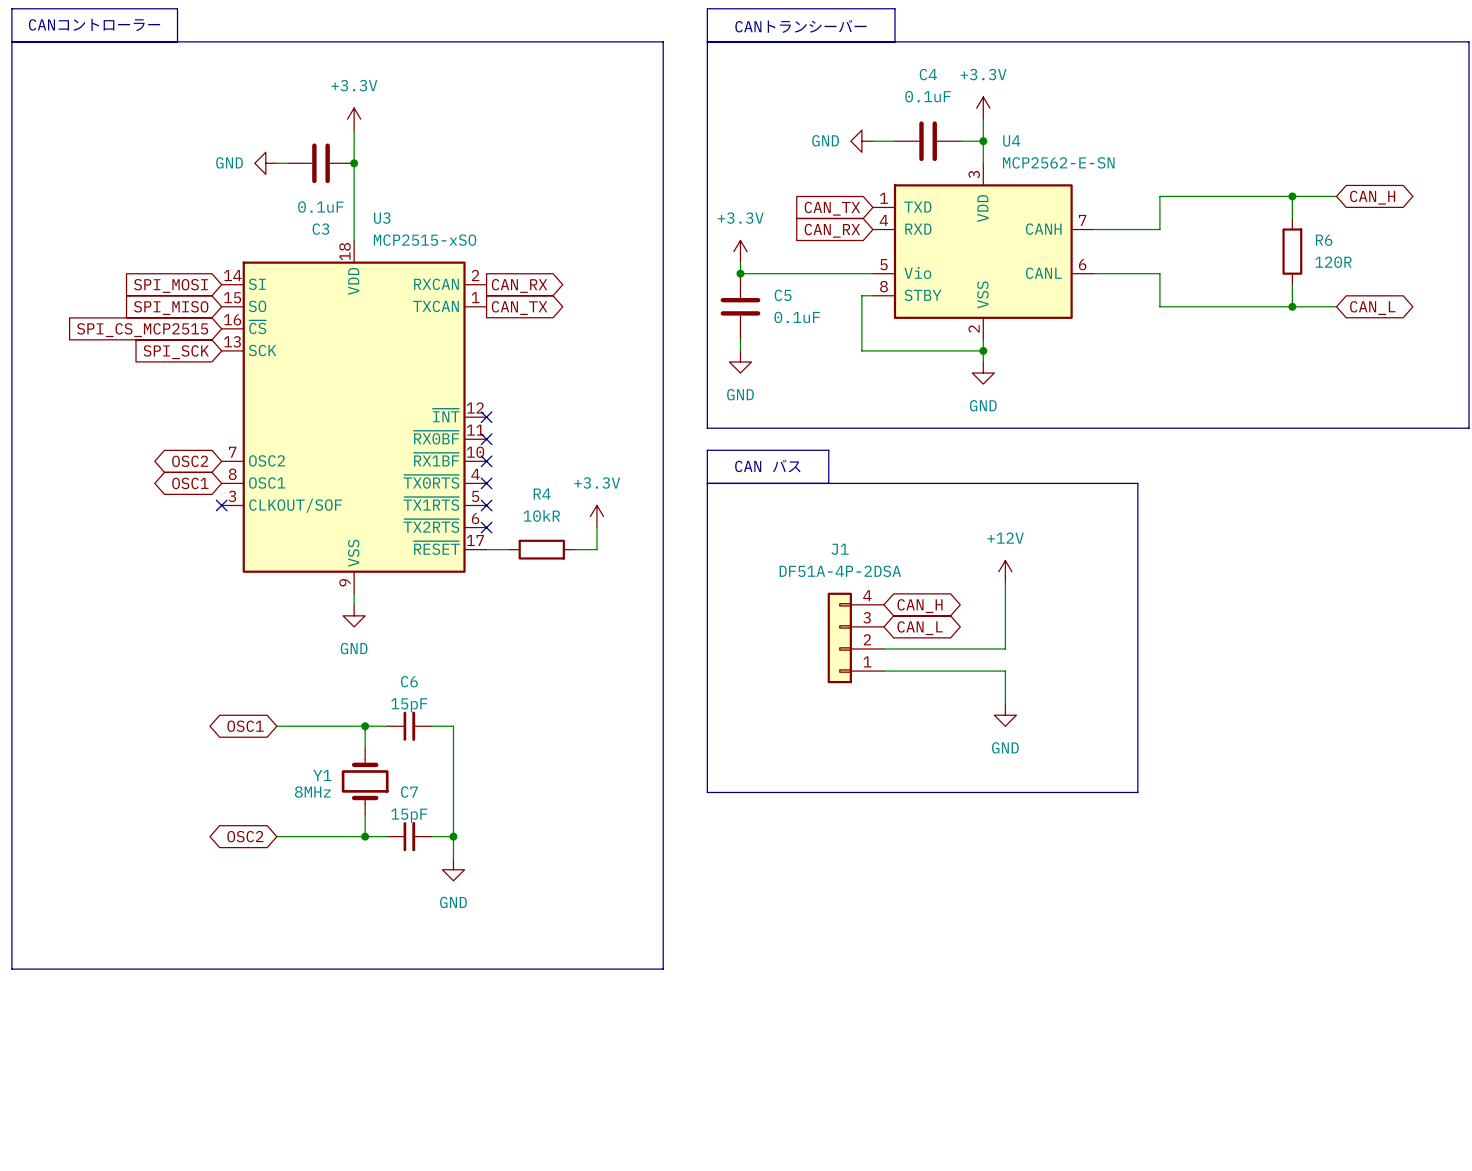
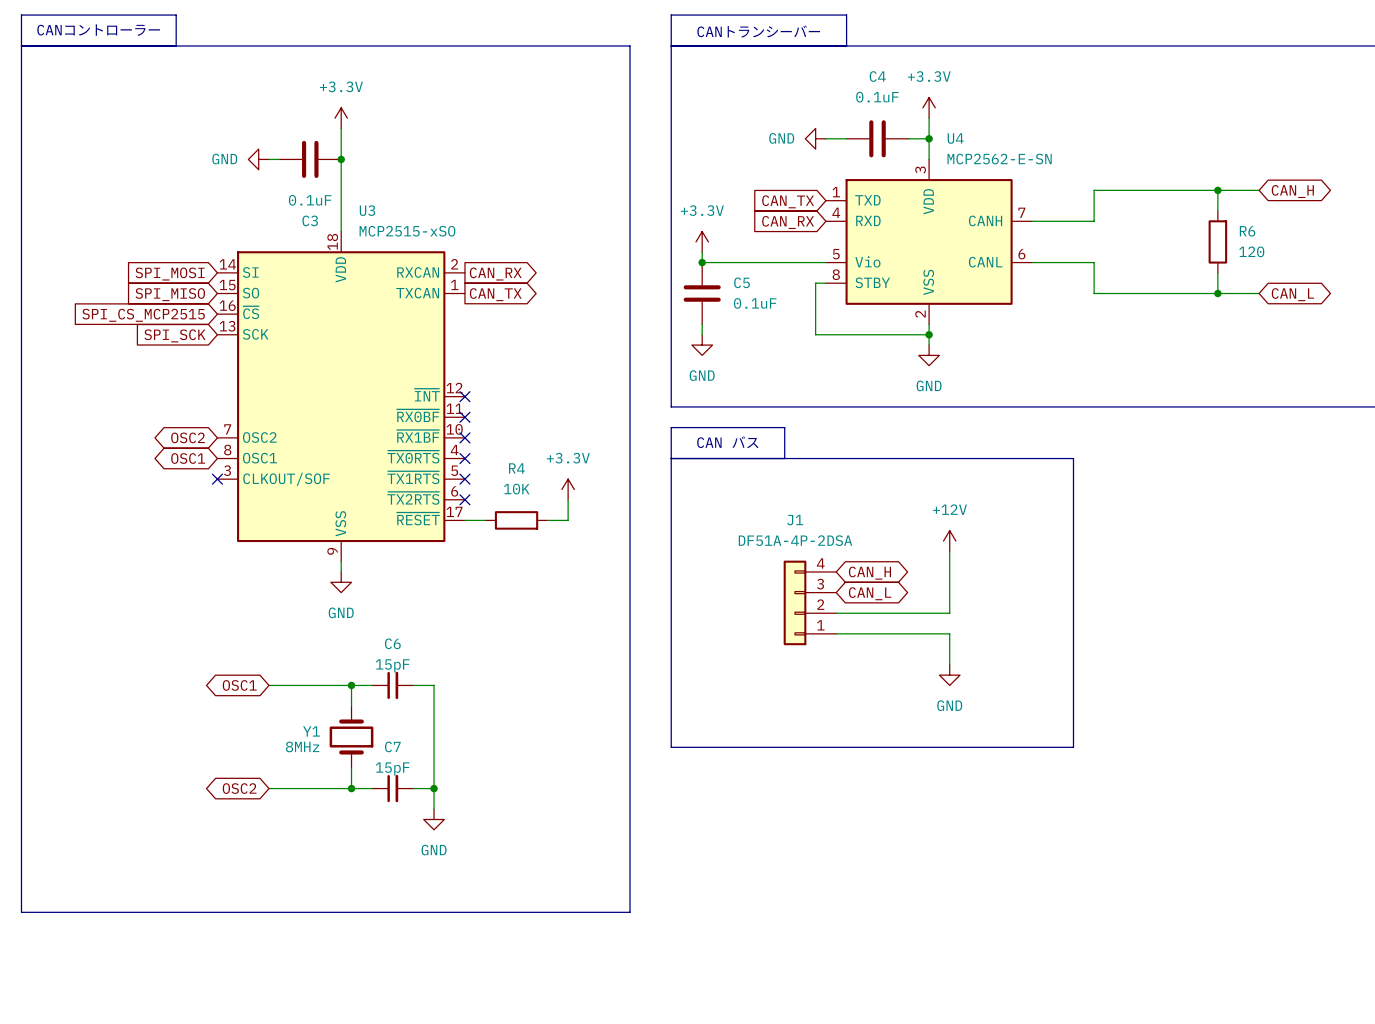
R6 value: 120R (1333, 262) -> 120 (1251, 251)
R4 value: 10kR (541, 515) -> 10K (516, 489)

